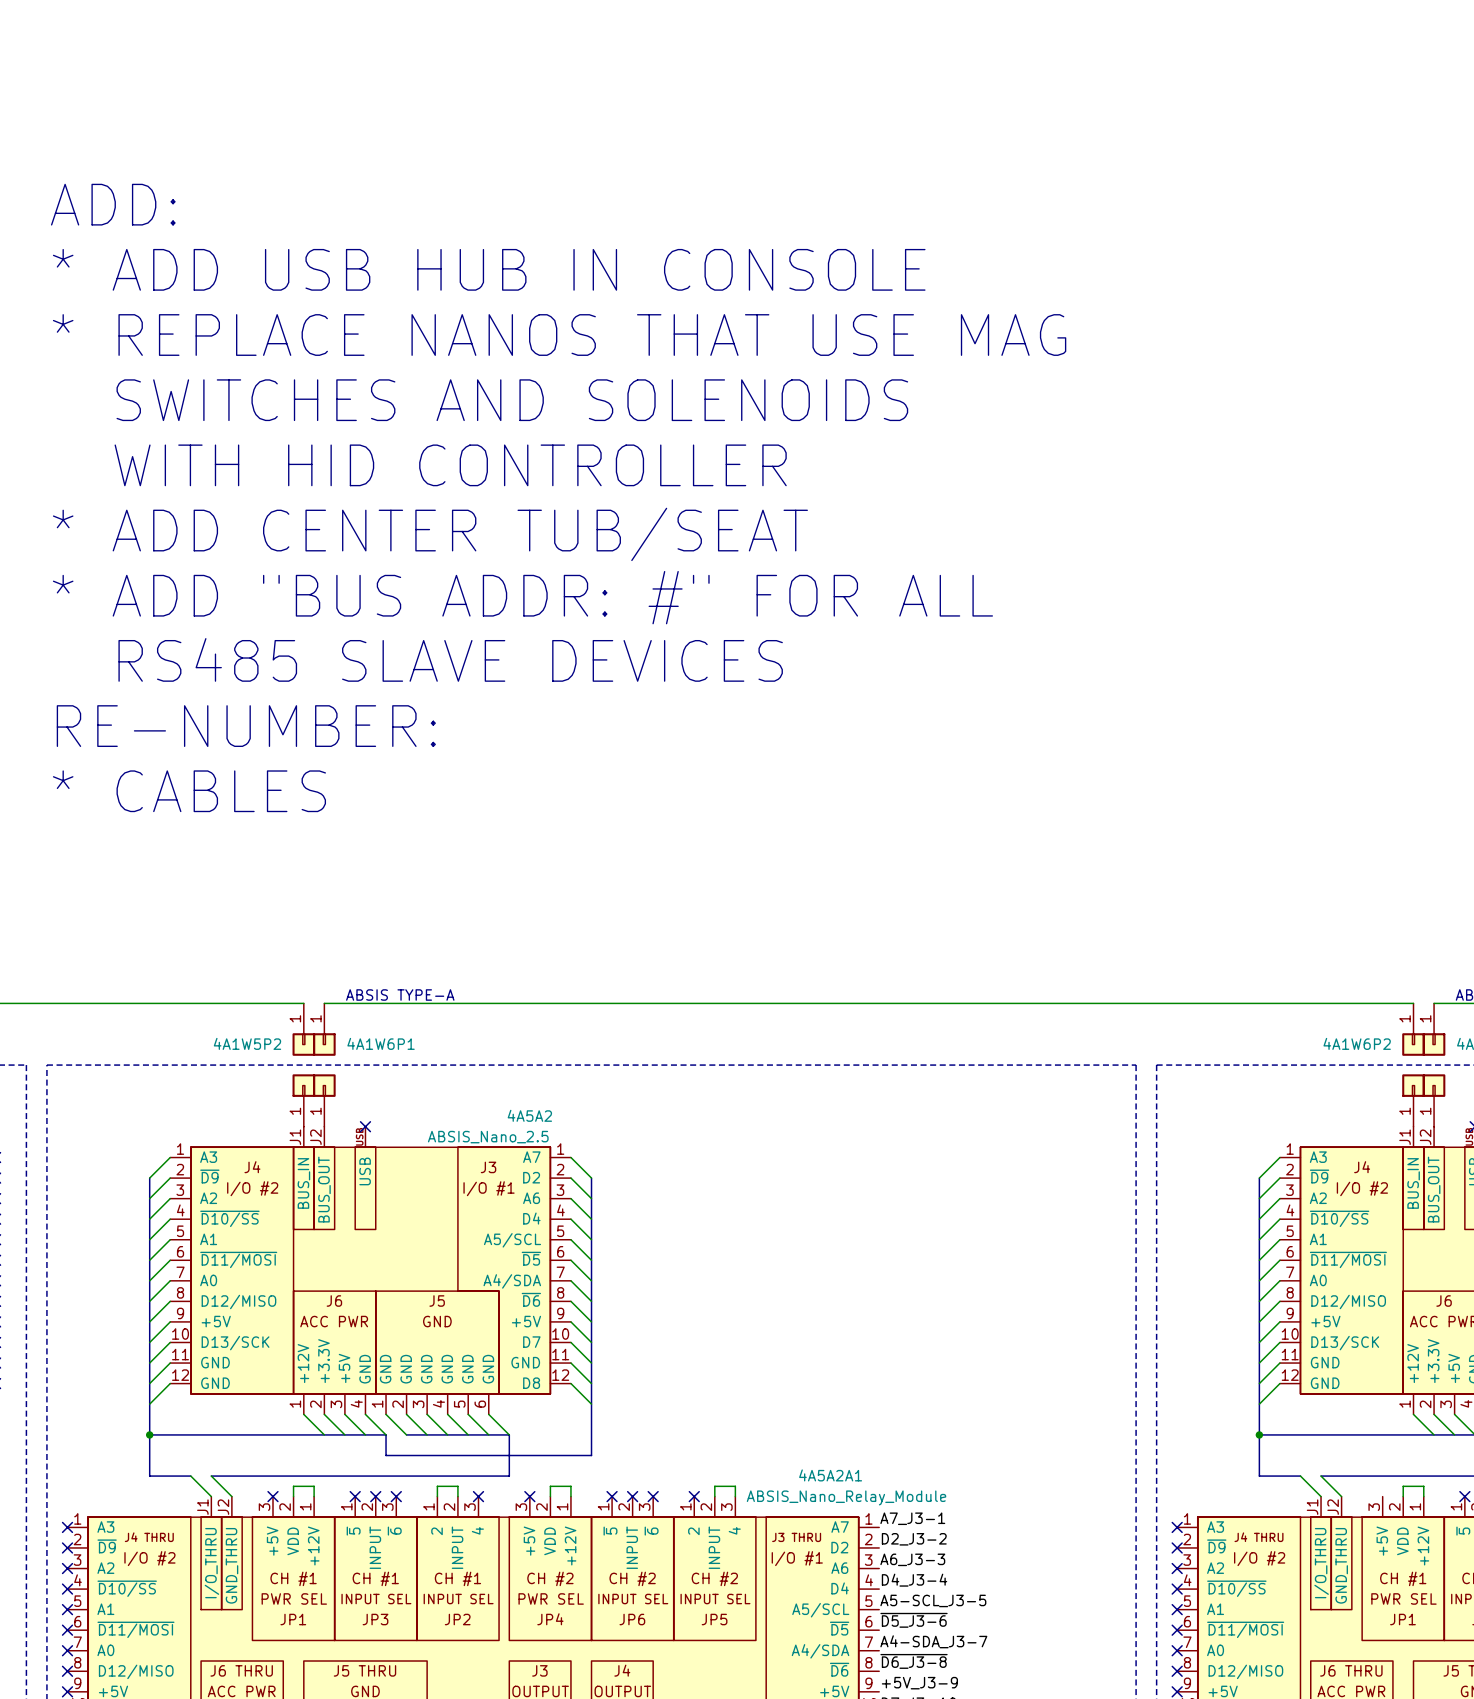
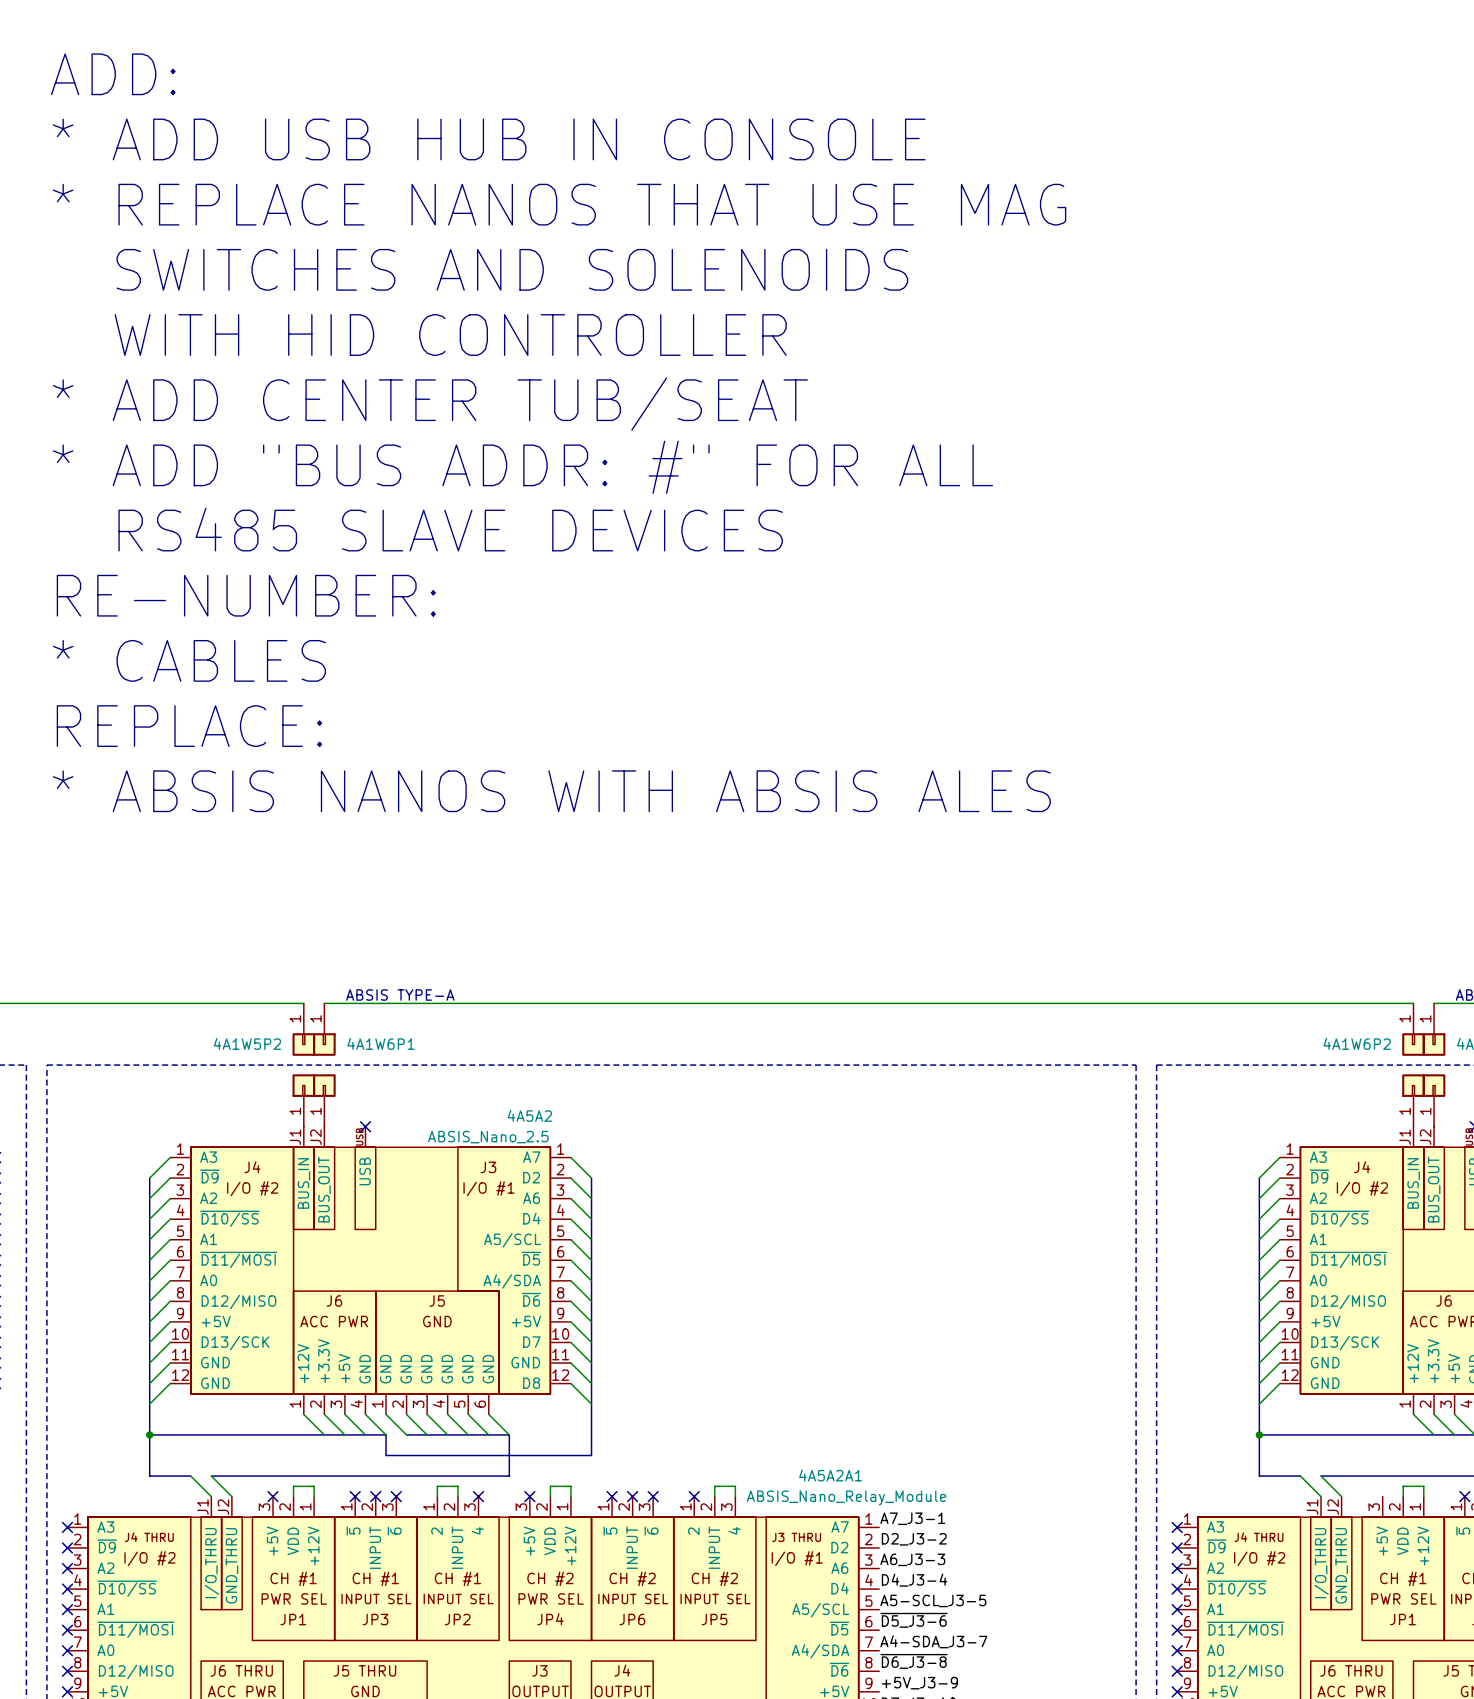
text: none -> ADD: (113, 74)
text: none -> * ADD USB HUB IN CONSOLE (489, 139)
text: ADD: (113, 204) -> * REPLACE NANOS THAT USE MAG (559, 204)
text: * ADD USB HUB IN CONSOLE (489, 269) -> SWITCHES AND SOLENOIDS (512, 269)
text: * REPLACE NANOS THAT USE MAG (559, 335) -> WITH HID CONTROLLER (450, 335)
text: SWITCHES AND SOLENOIDS (512, 400) -> * ADD CENTER TUB/SEAT (430, 404)
text: WITH HID CONTROLLER (450, 465) -> * ADD "BUS ADDR: #" FOR ALL (522, 467)
text: * ADD CENTER TUB/SEAT (430, 534) -> RS485 SLAVE DEVICES (450, 529)
text: * ADD "BUS ADDR: #" FOR ALL (522, 597) -> RE-NUMBER: (246, 595)
text: RS485 SLAVE DEVICES (450, 659) -> * CABLES (189, 660)
text: RE-NUMBER: (246, 726) -> REPLACE: (189, 726)
text: * CABLES (189, 791) -> * ABSIS NANOS WITH ABSIS ALES (551, 791)

